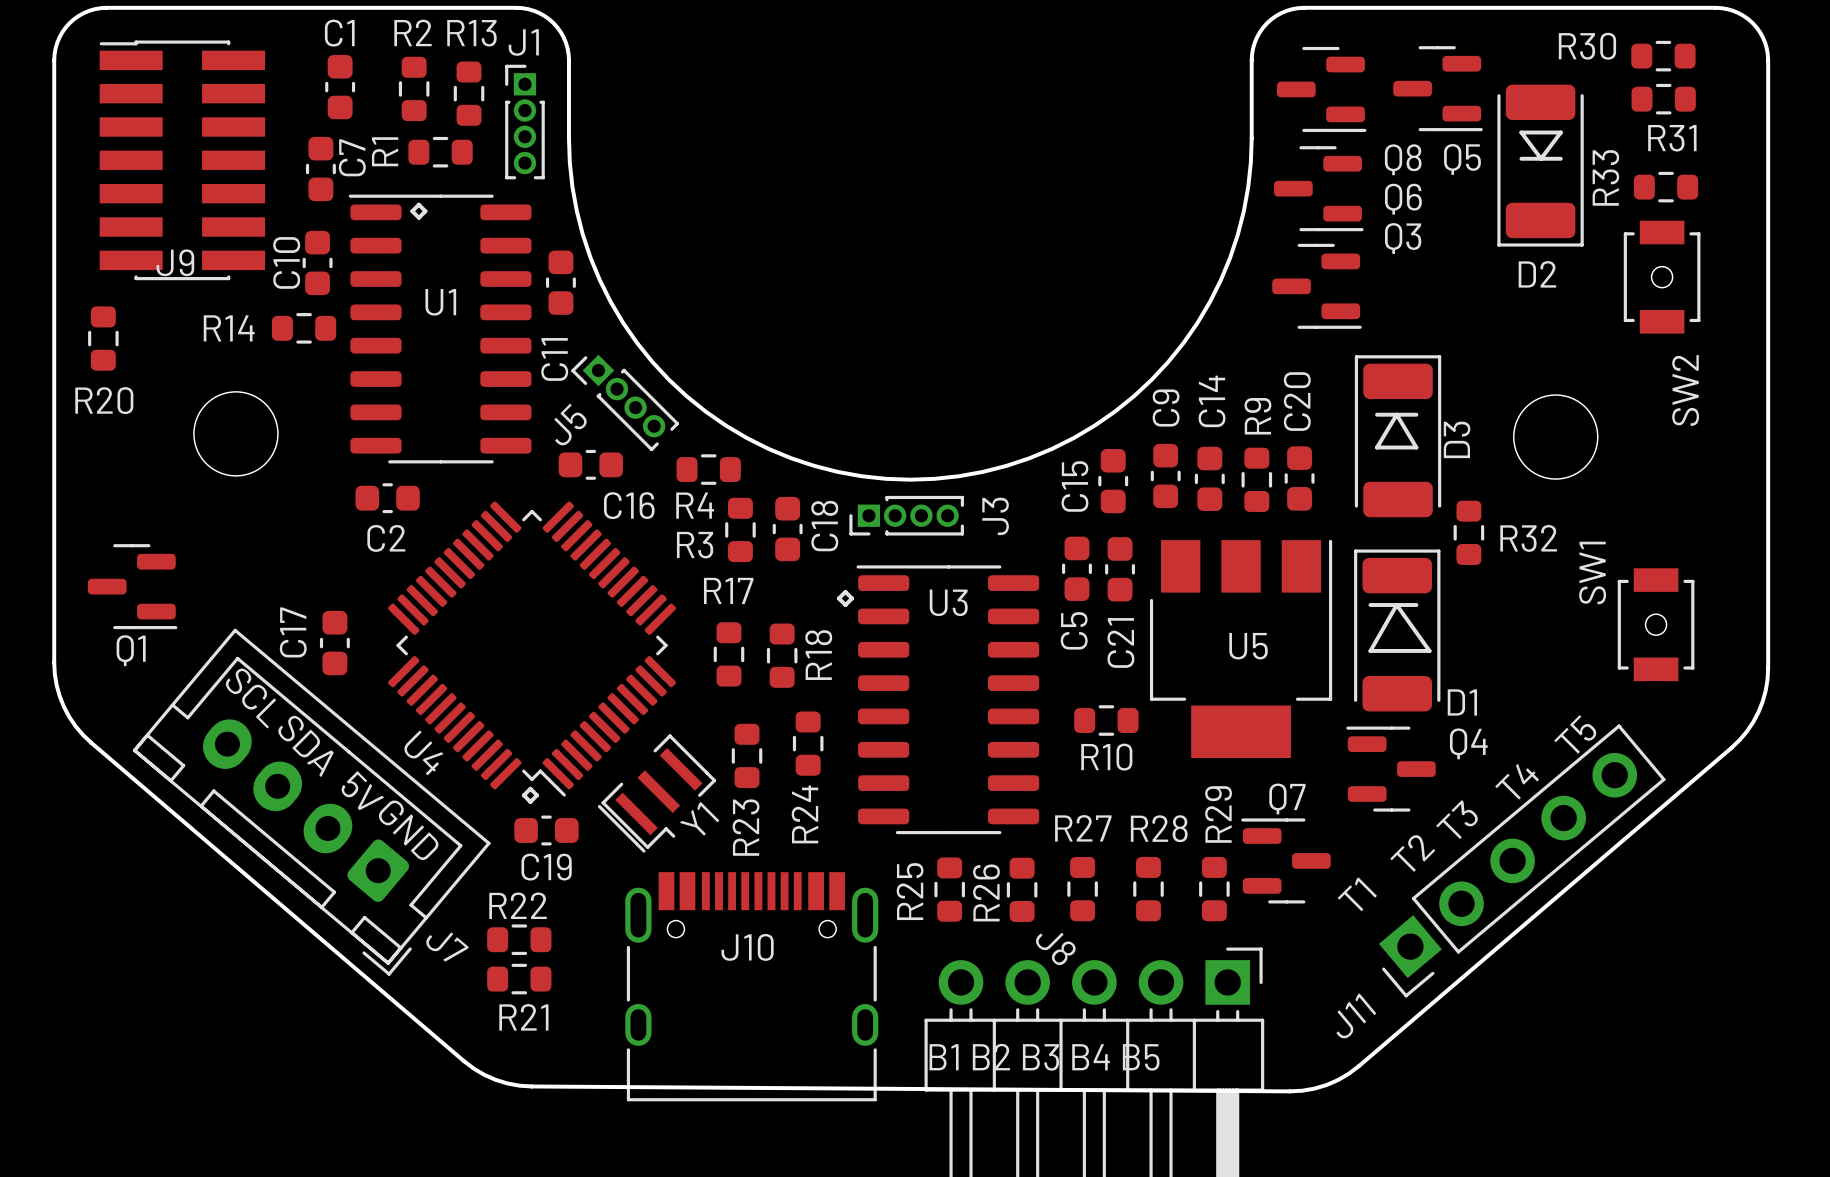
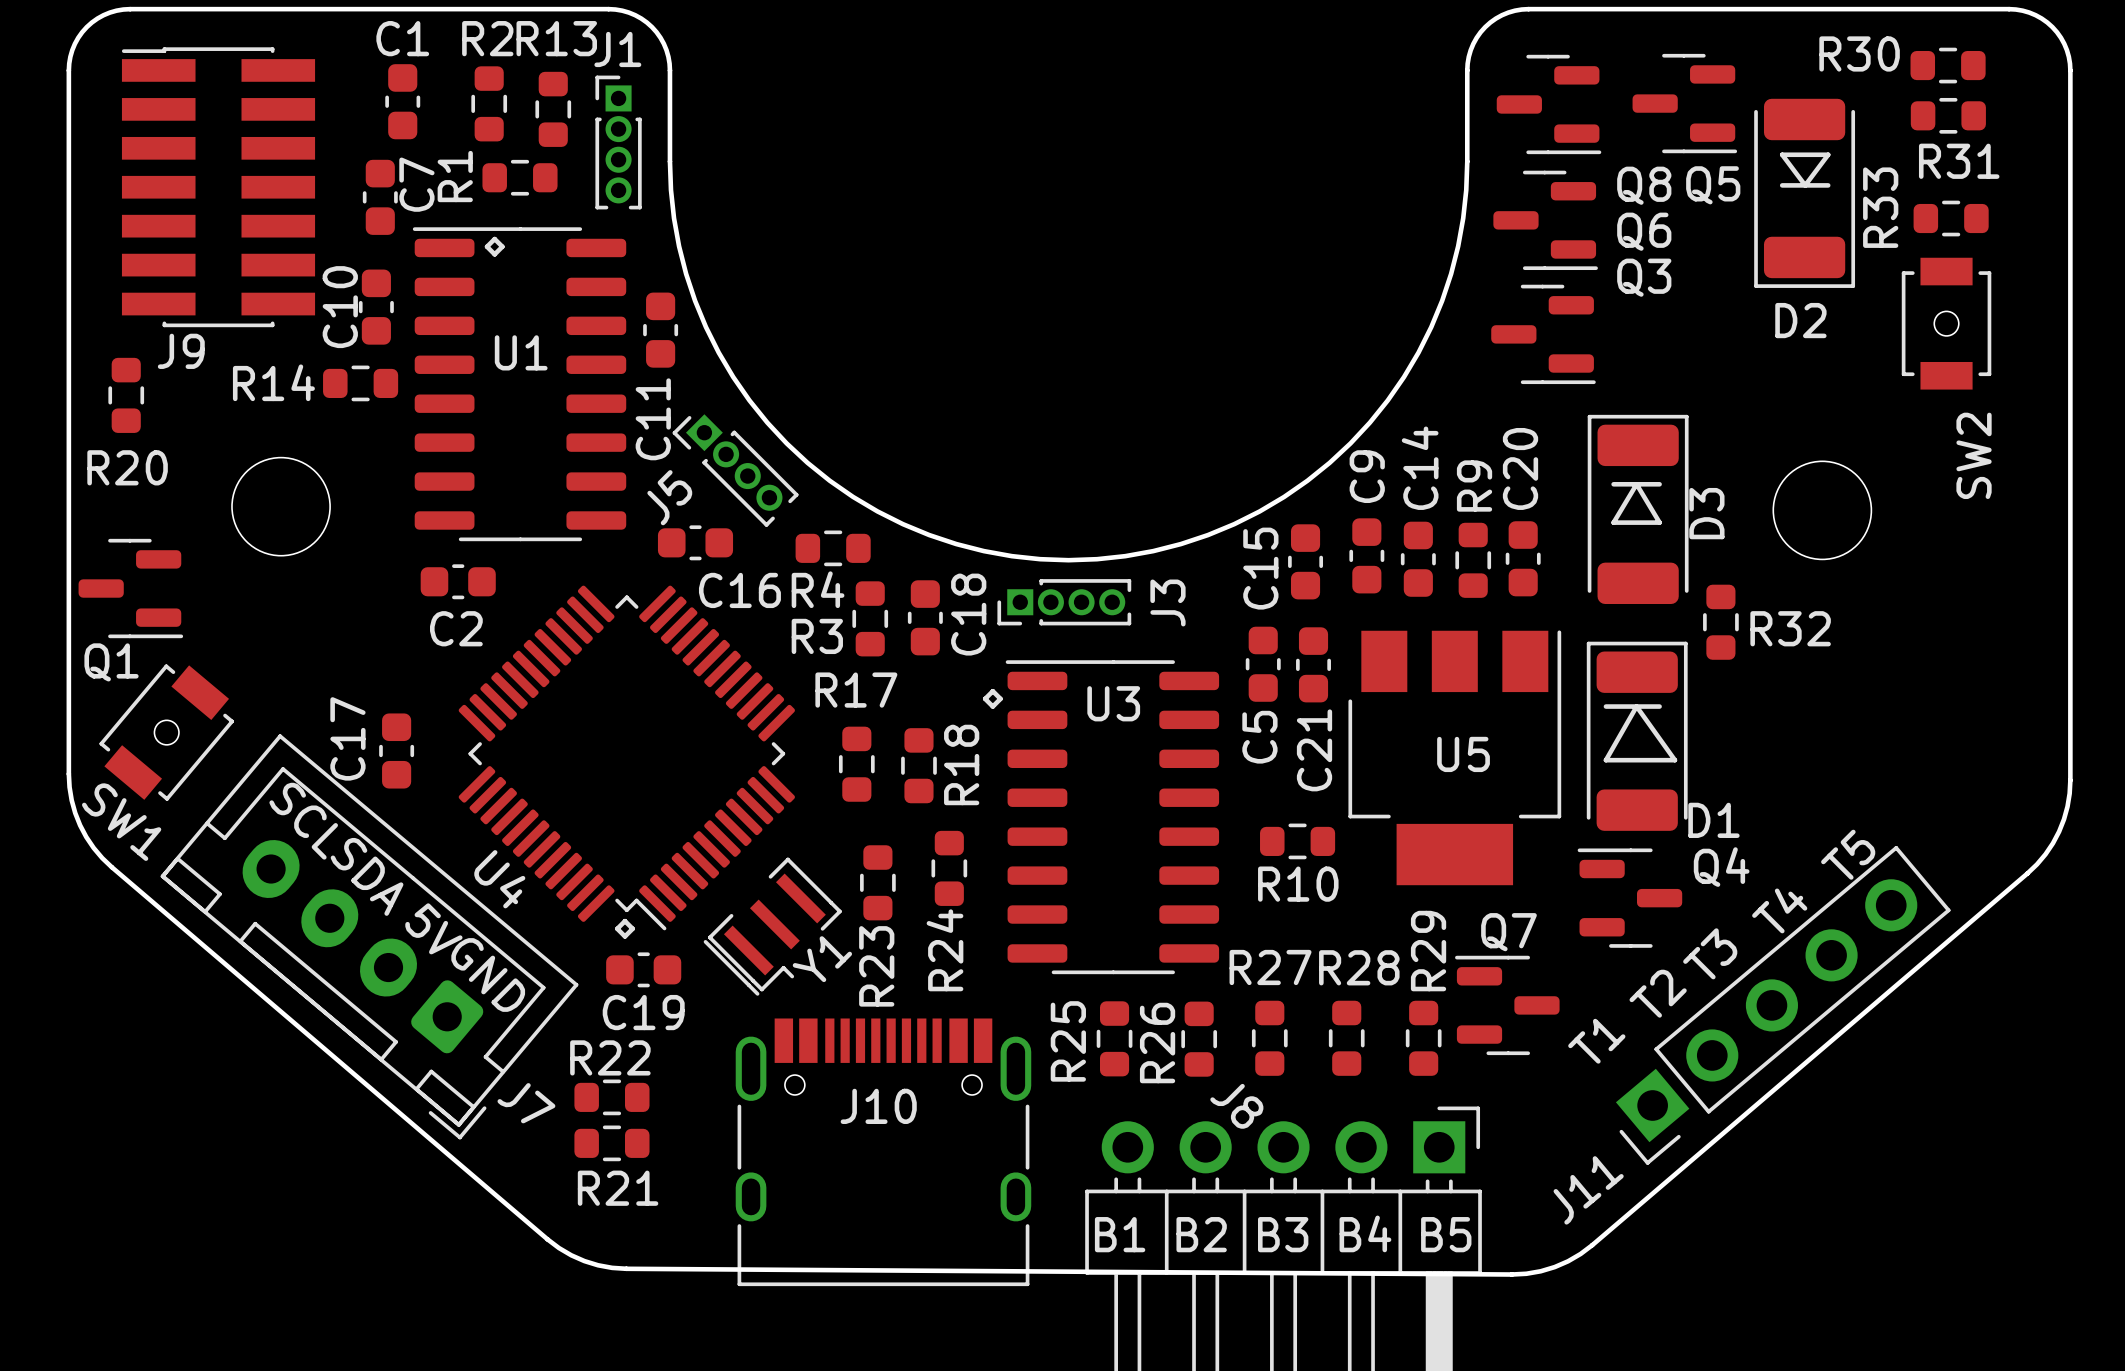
J9 name position: J9 (175, 262) -> J9 (181, 351)
SW1 name position: SW1 (1592, 572) -> SW1 (121, 822)
Q1 position: (132, 586) -> (130, 588)
SW1 rotation: 0° (1656, 624) -> 40° clockwise (166, 732)
SW1 position: (1656, 624) -> (166, 732)
Q1 name position: Q1 (131, 650) -> Q1 (111, 662)

